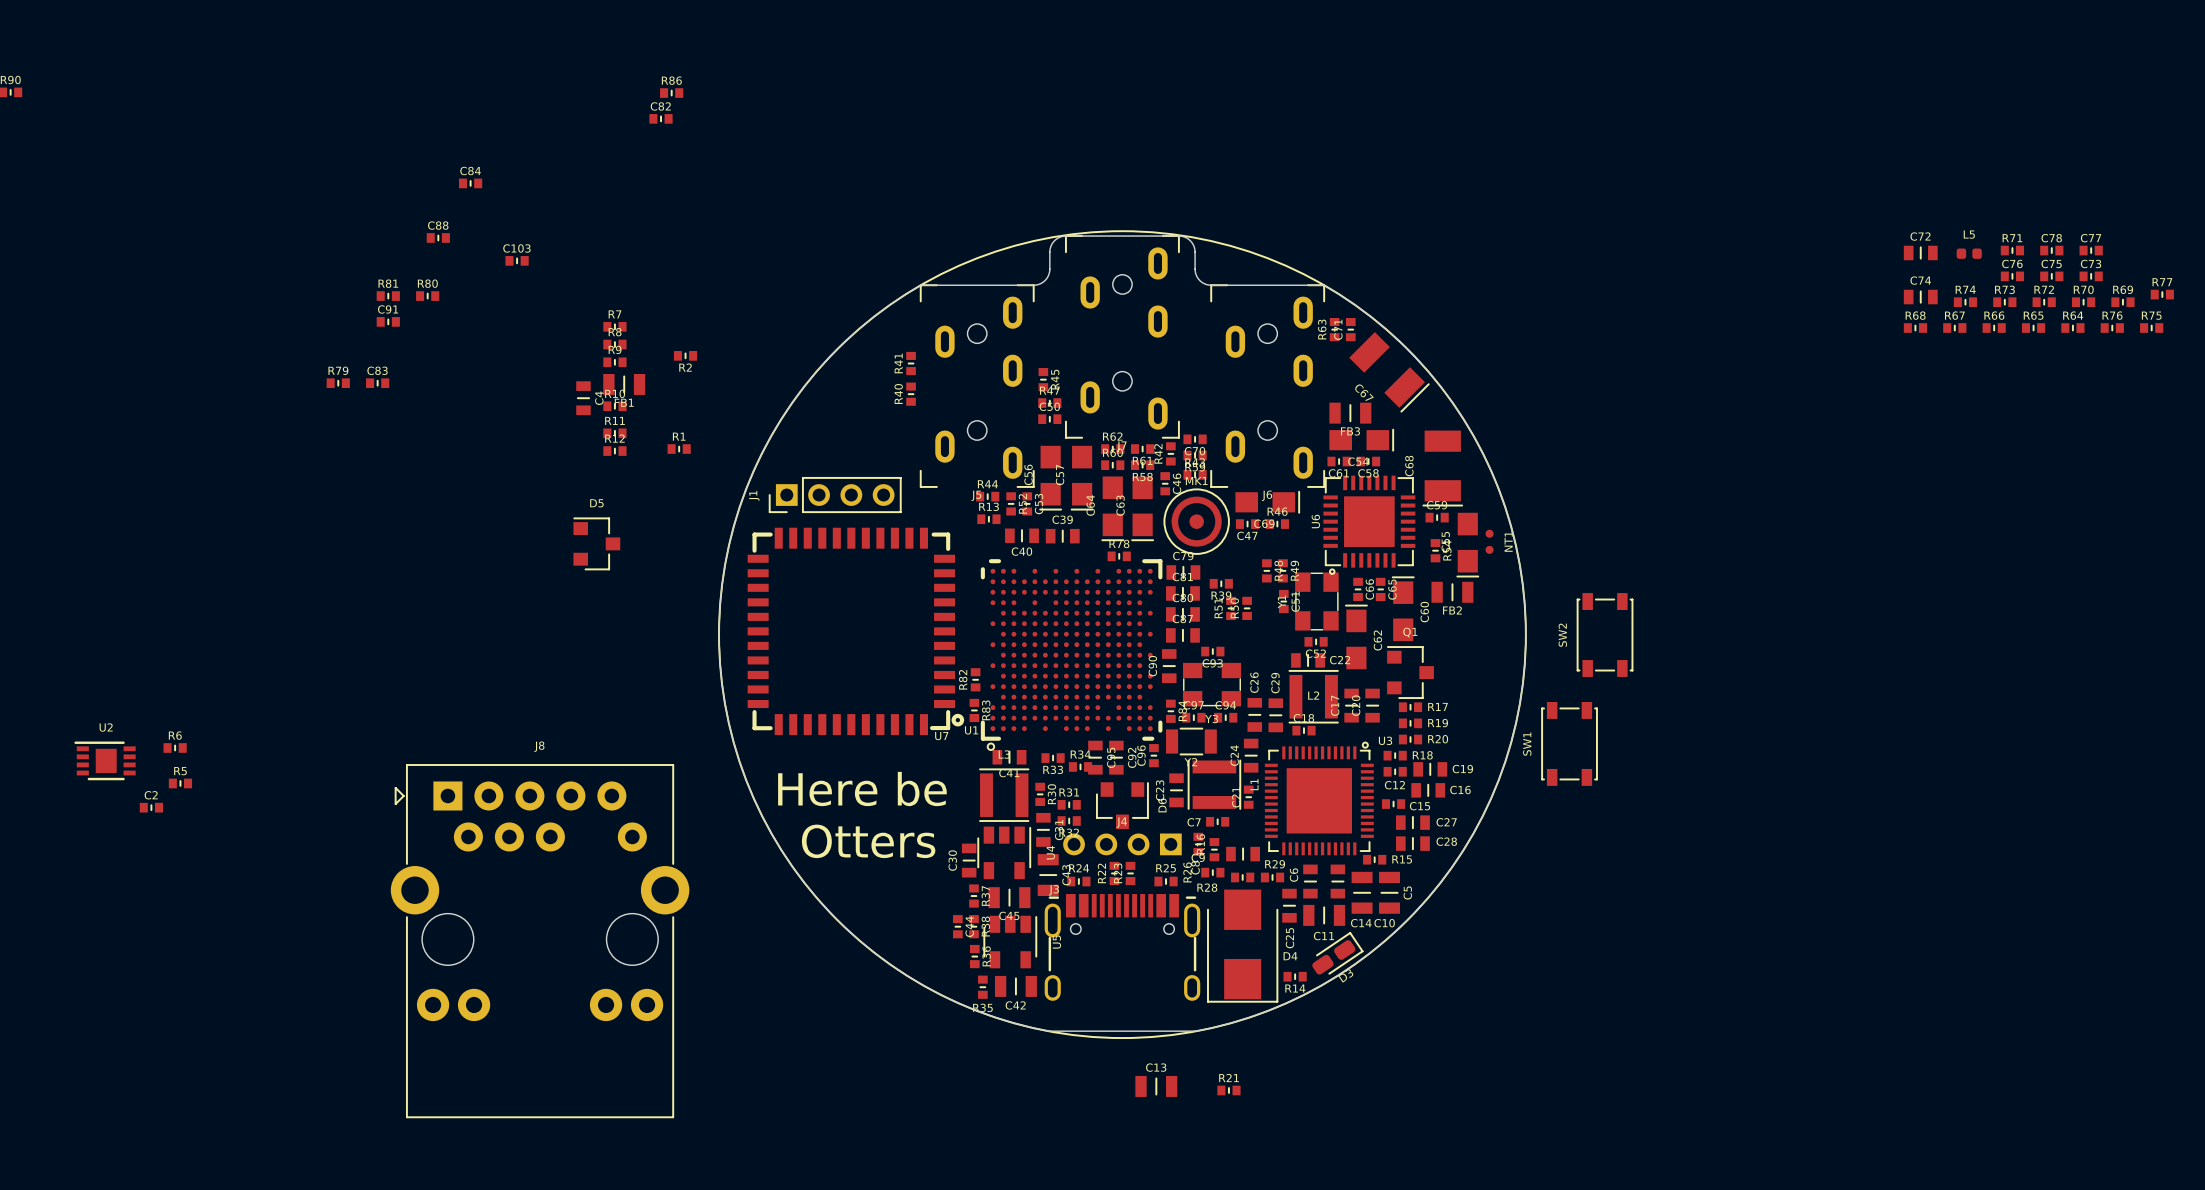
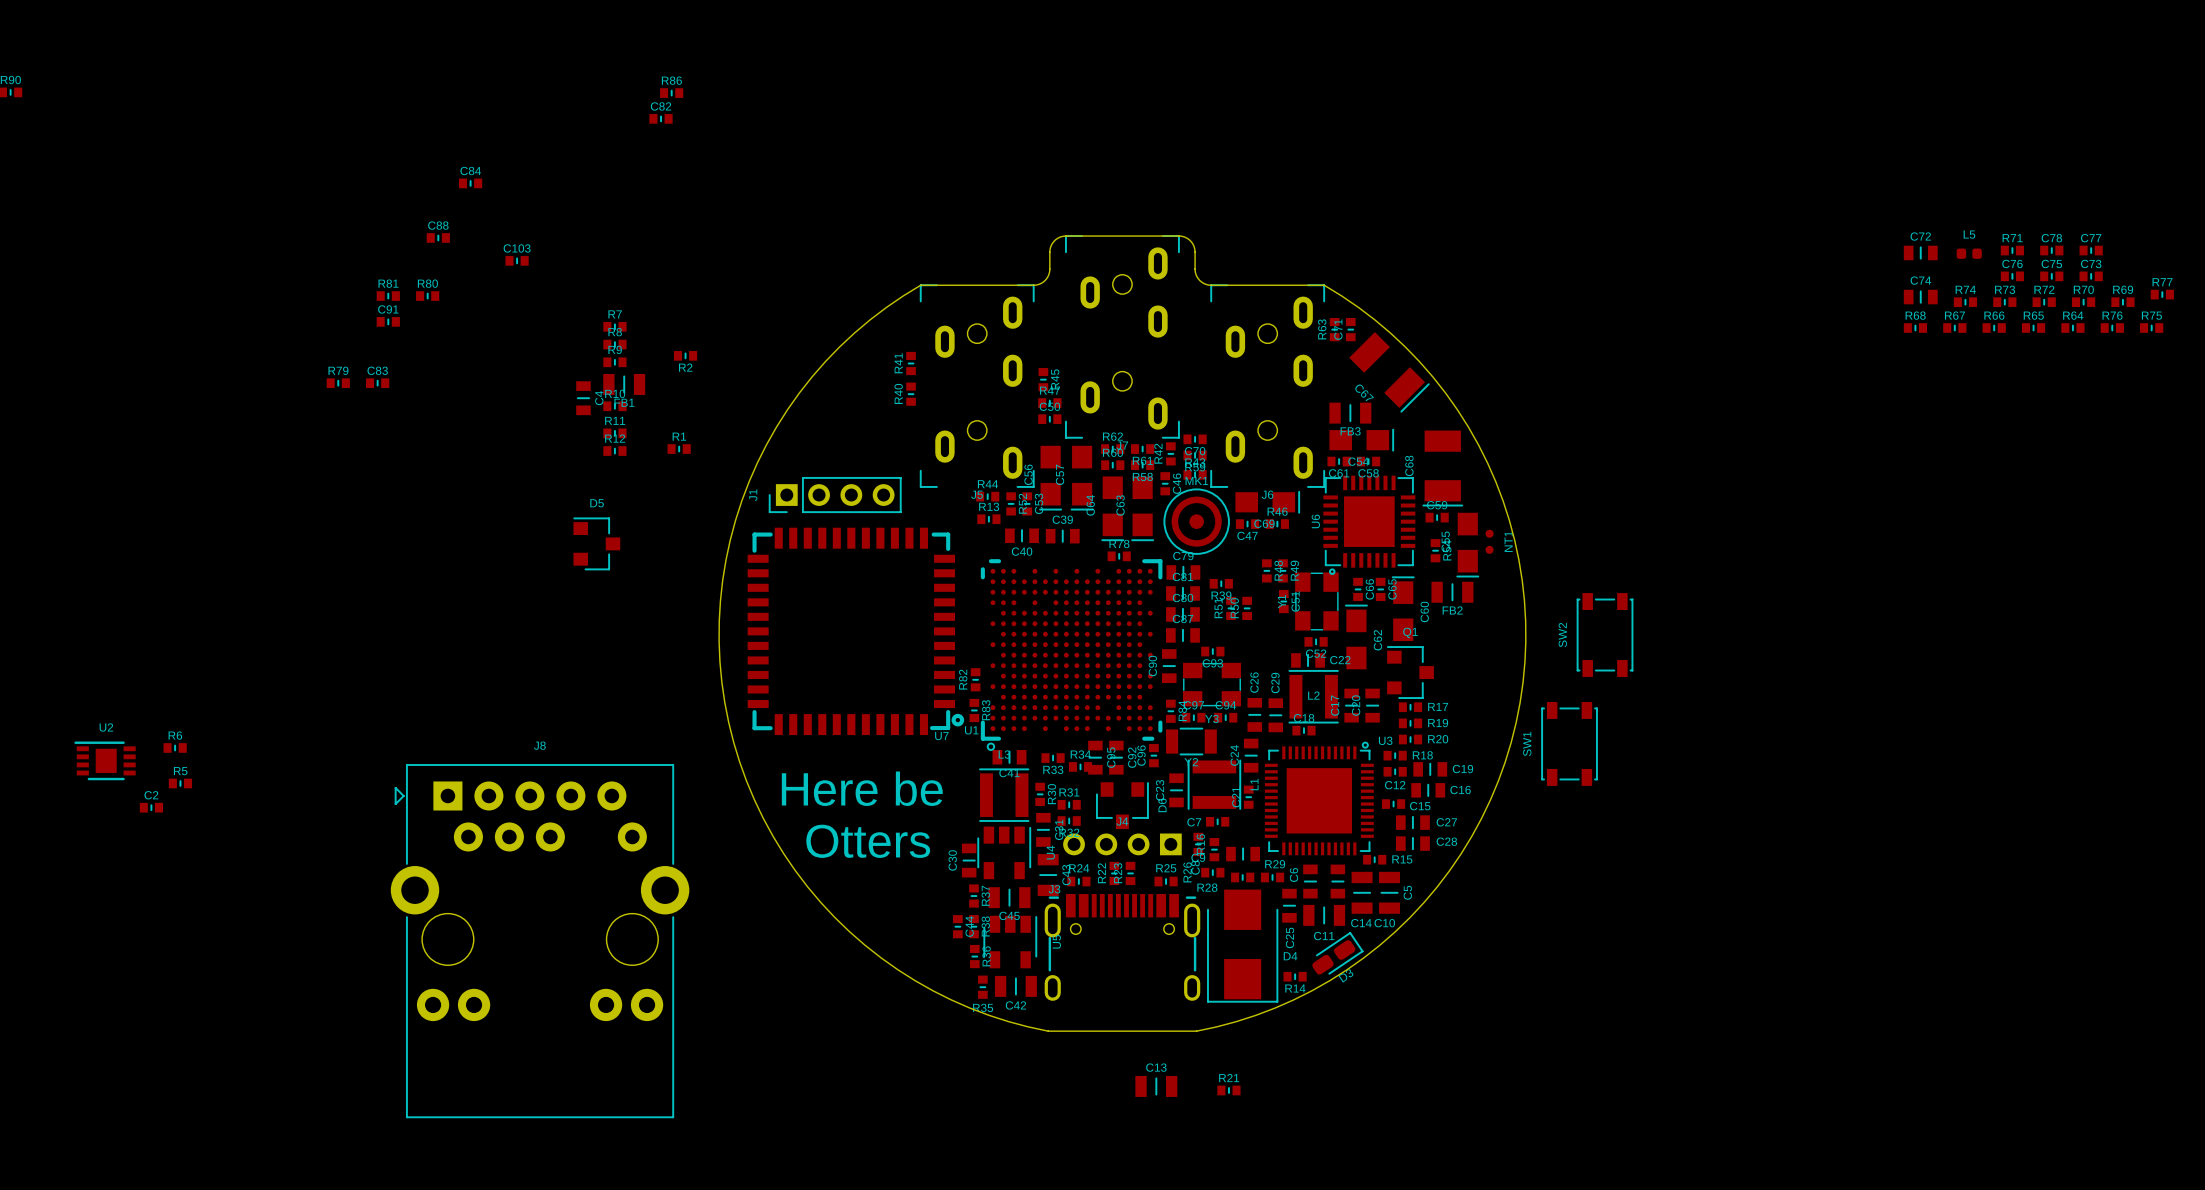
drawing: [718, 230, 1527, 1040] -> none

